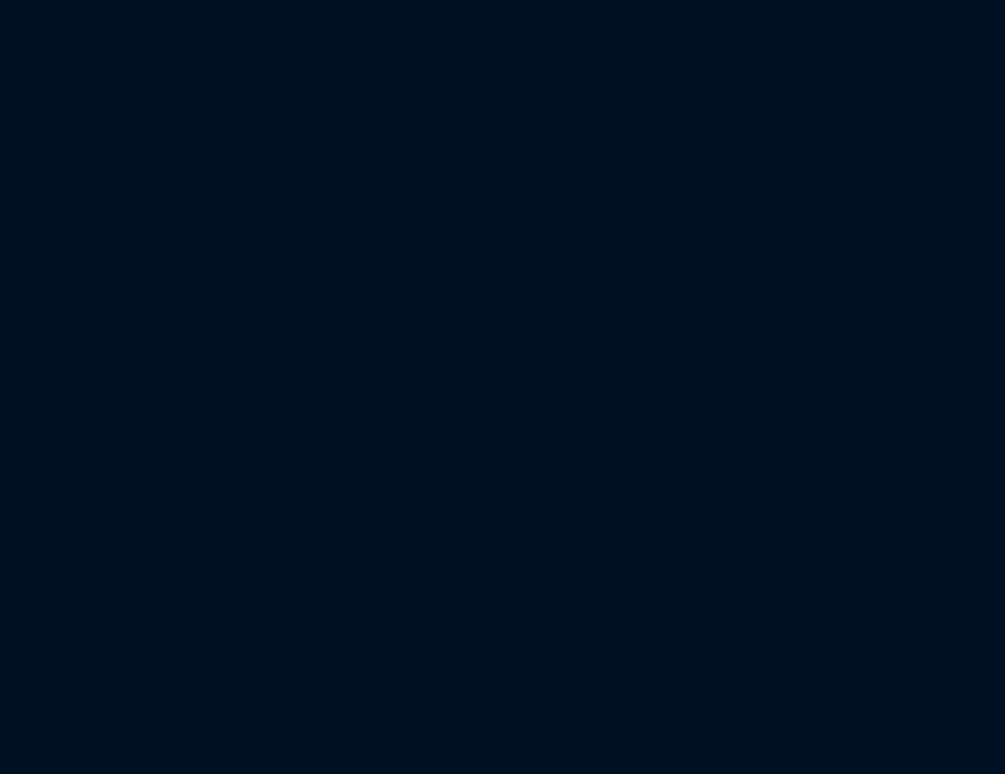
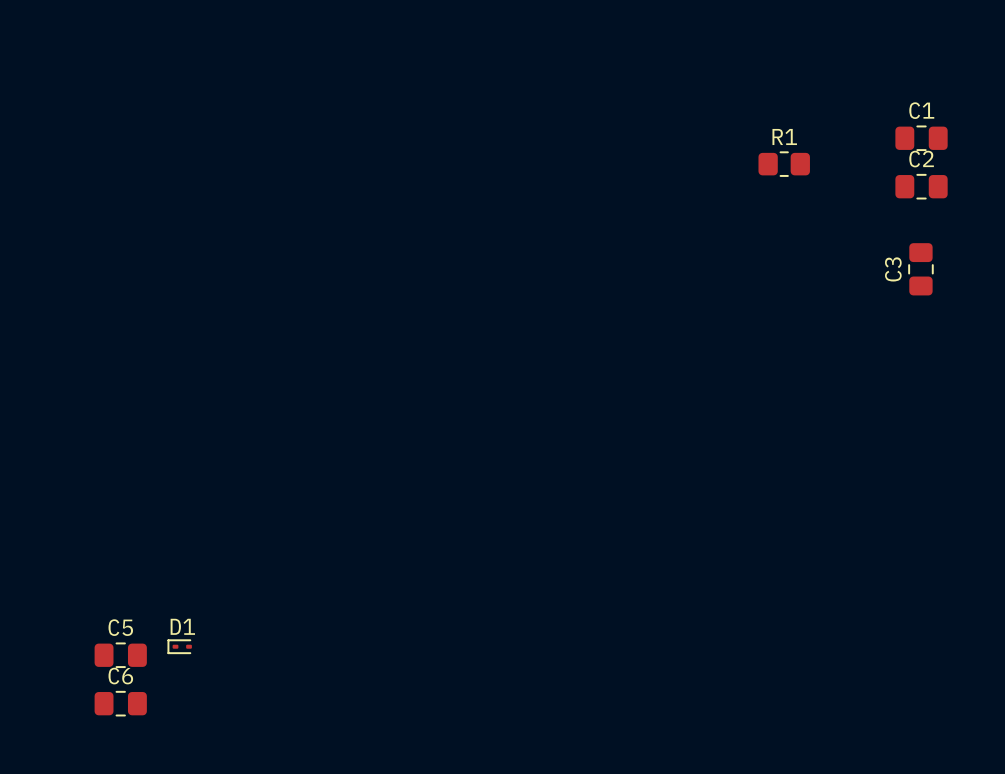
C1: none -> (921, 138)
R1: none -> (784, 164)
C2: none -> (921, 186)
C3: none -> (920, 269)
D1: none -> (179, 646)
C5: none -> (120, 655)
C6: none -> (120, 703)

